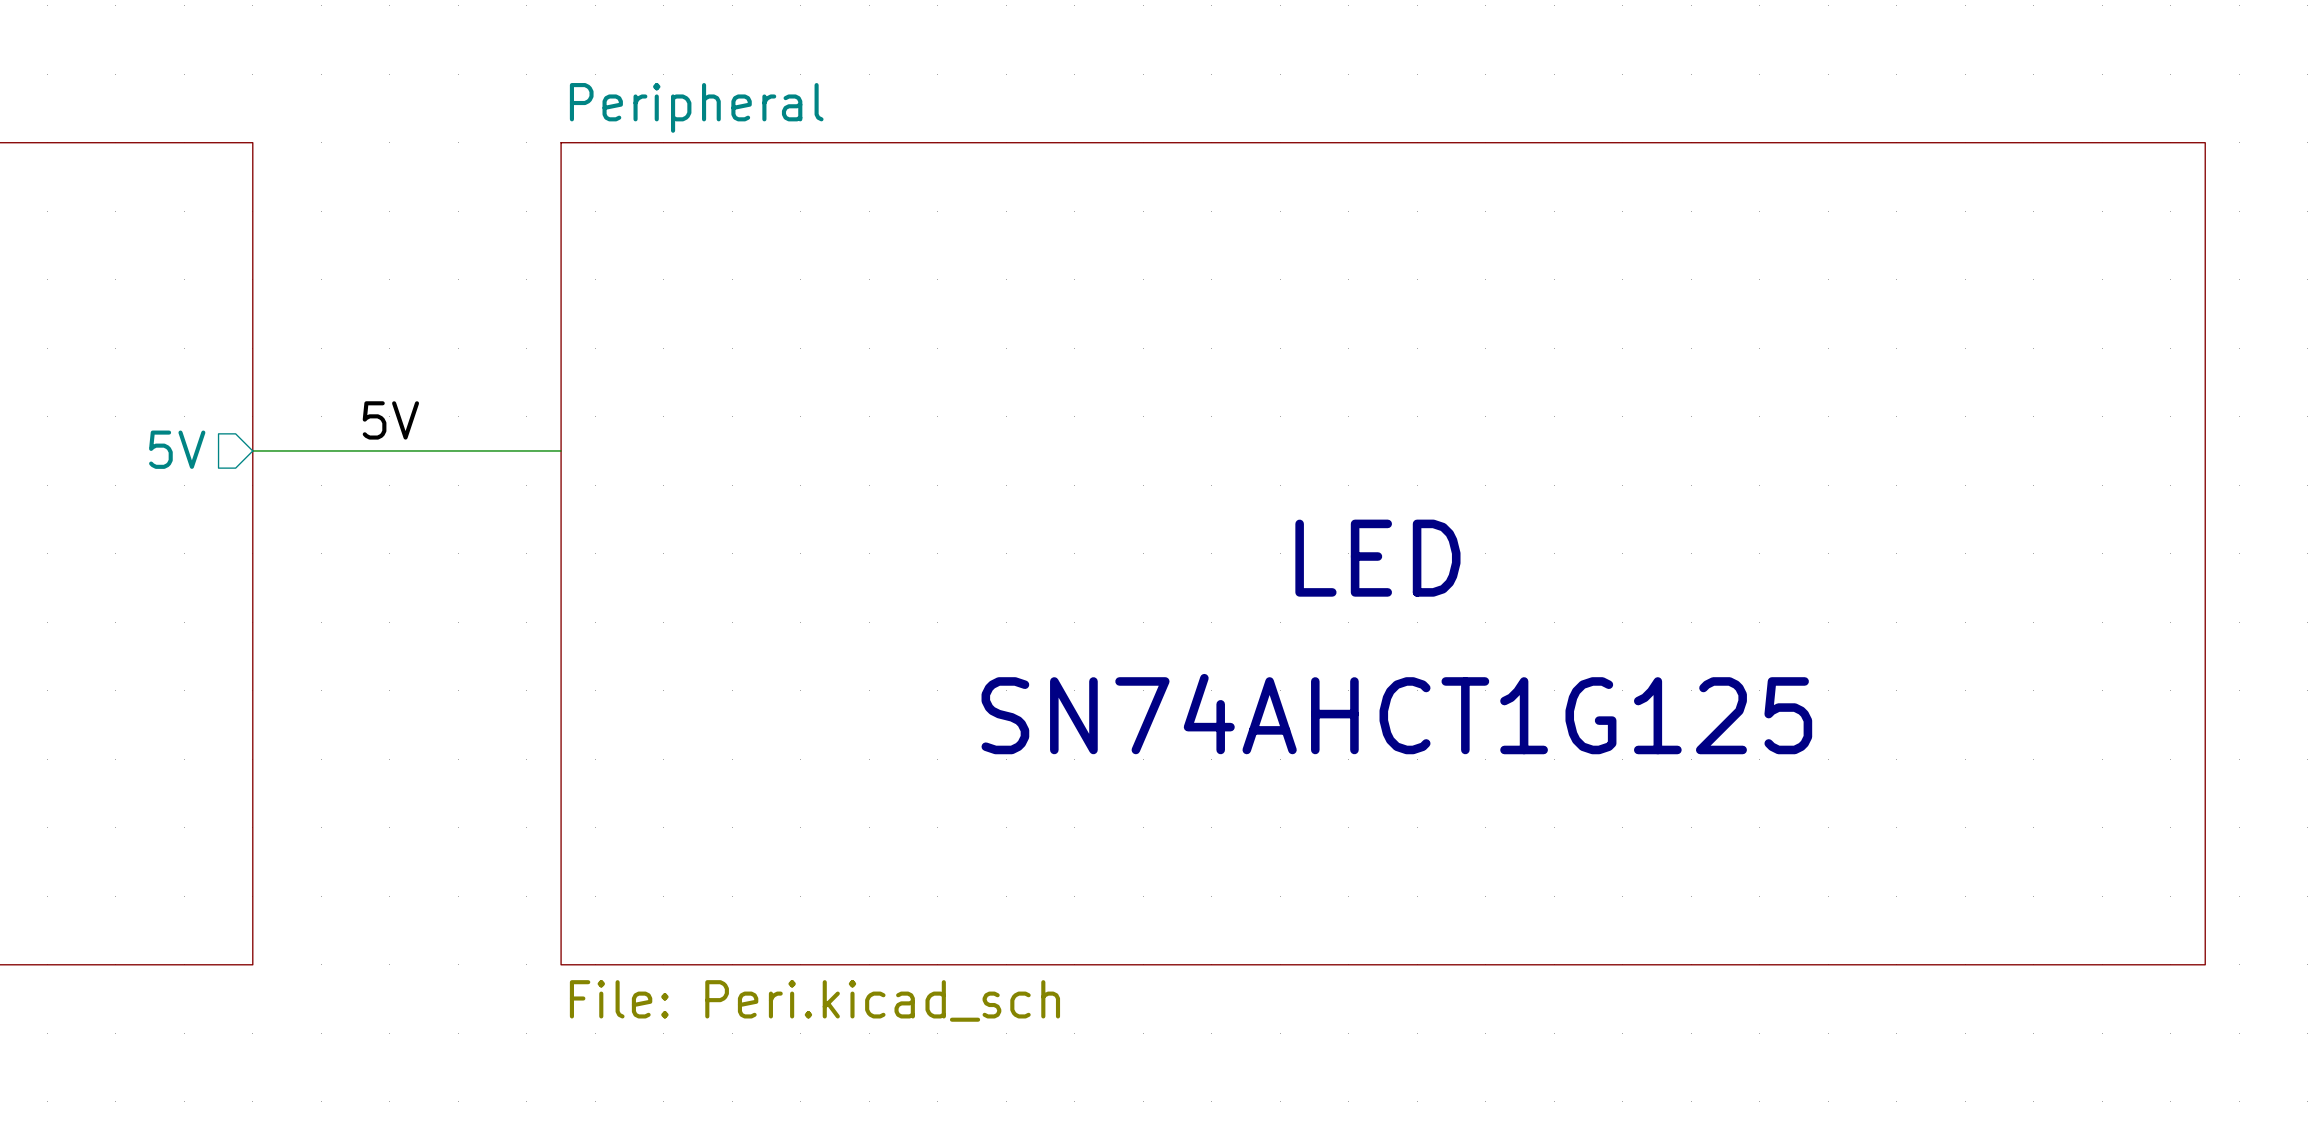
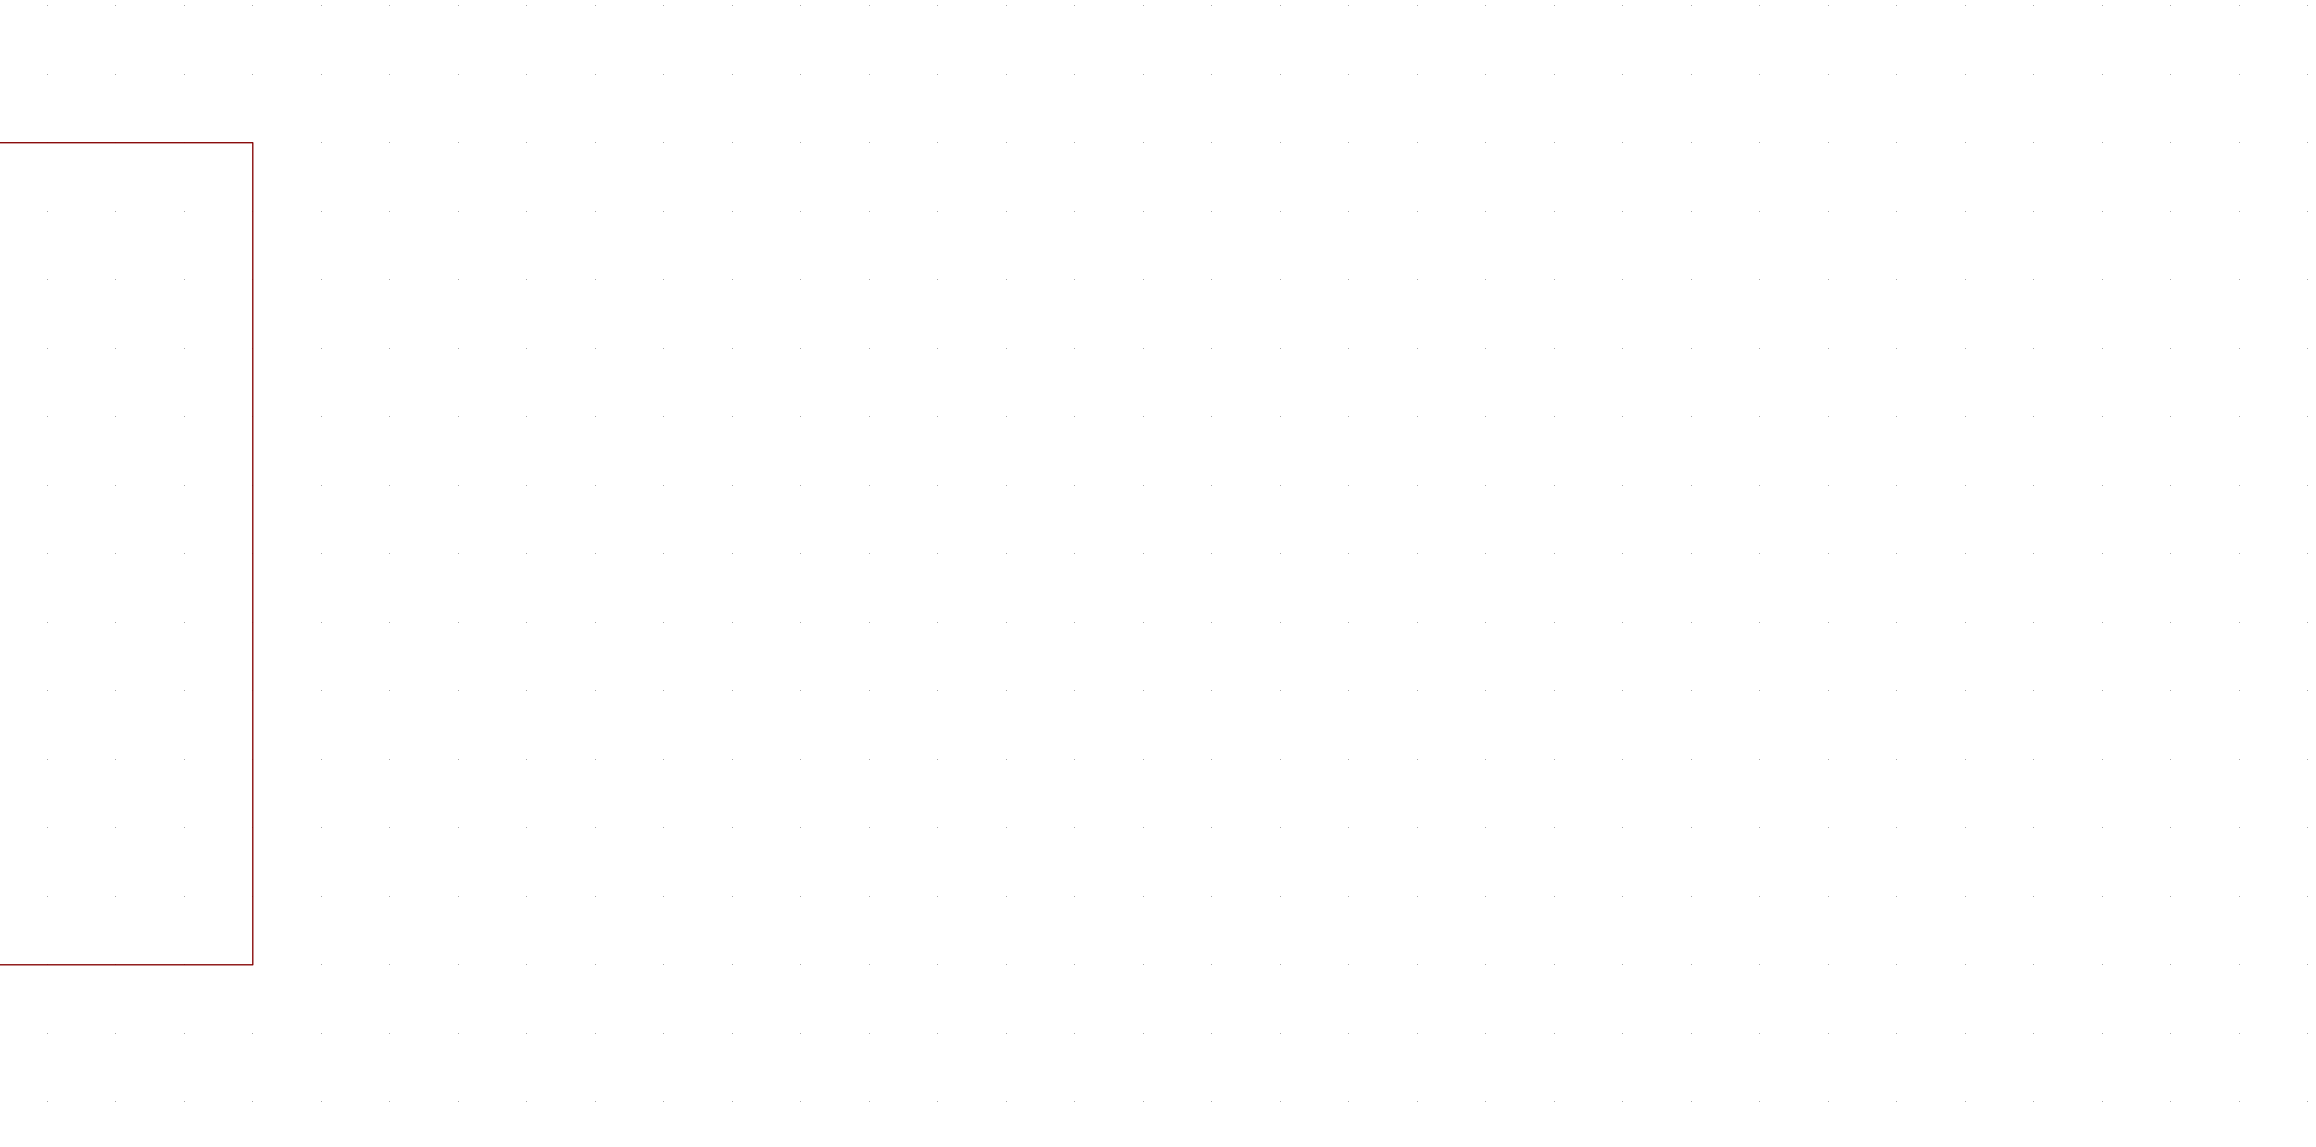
label: 5V (390, 420) -> none
sheet pin: 5V (177, 449) -> none
wire: (252, 450) (561, 450) -> none
sheet Peripheral: File: Peri.kicad_sch (1383, 553) -> none
text: LED (1377, 558) -> none
text: SN74AHCT1G125 (1396, 714) -> none

